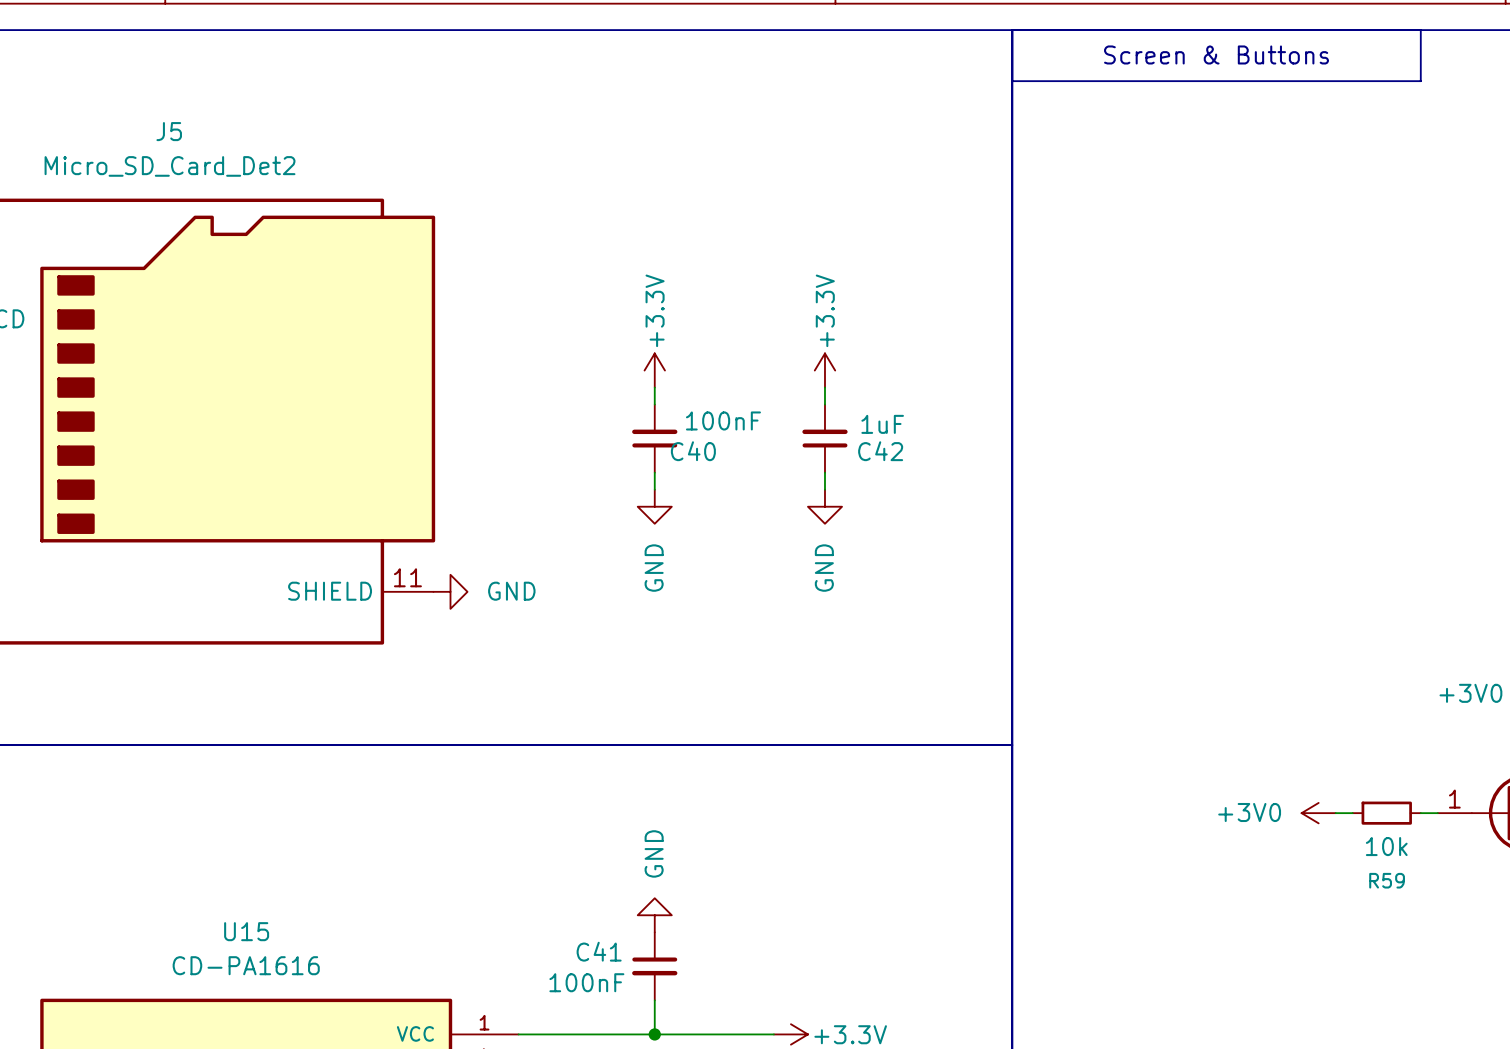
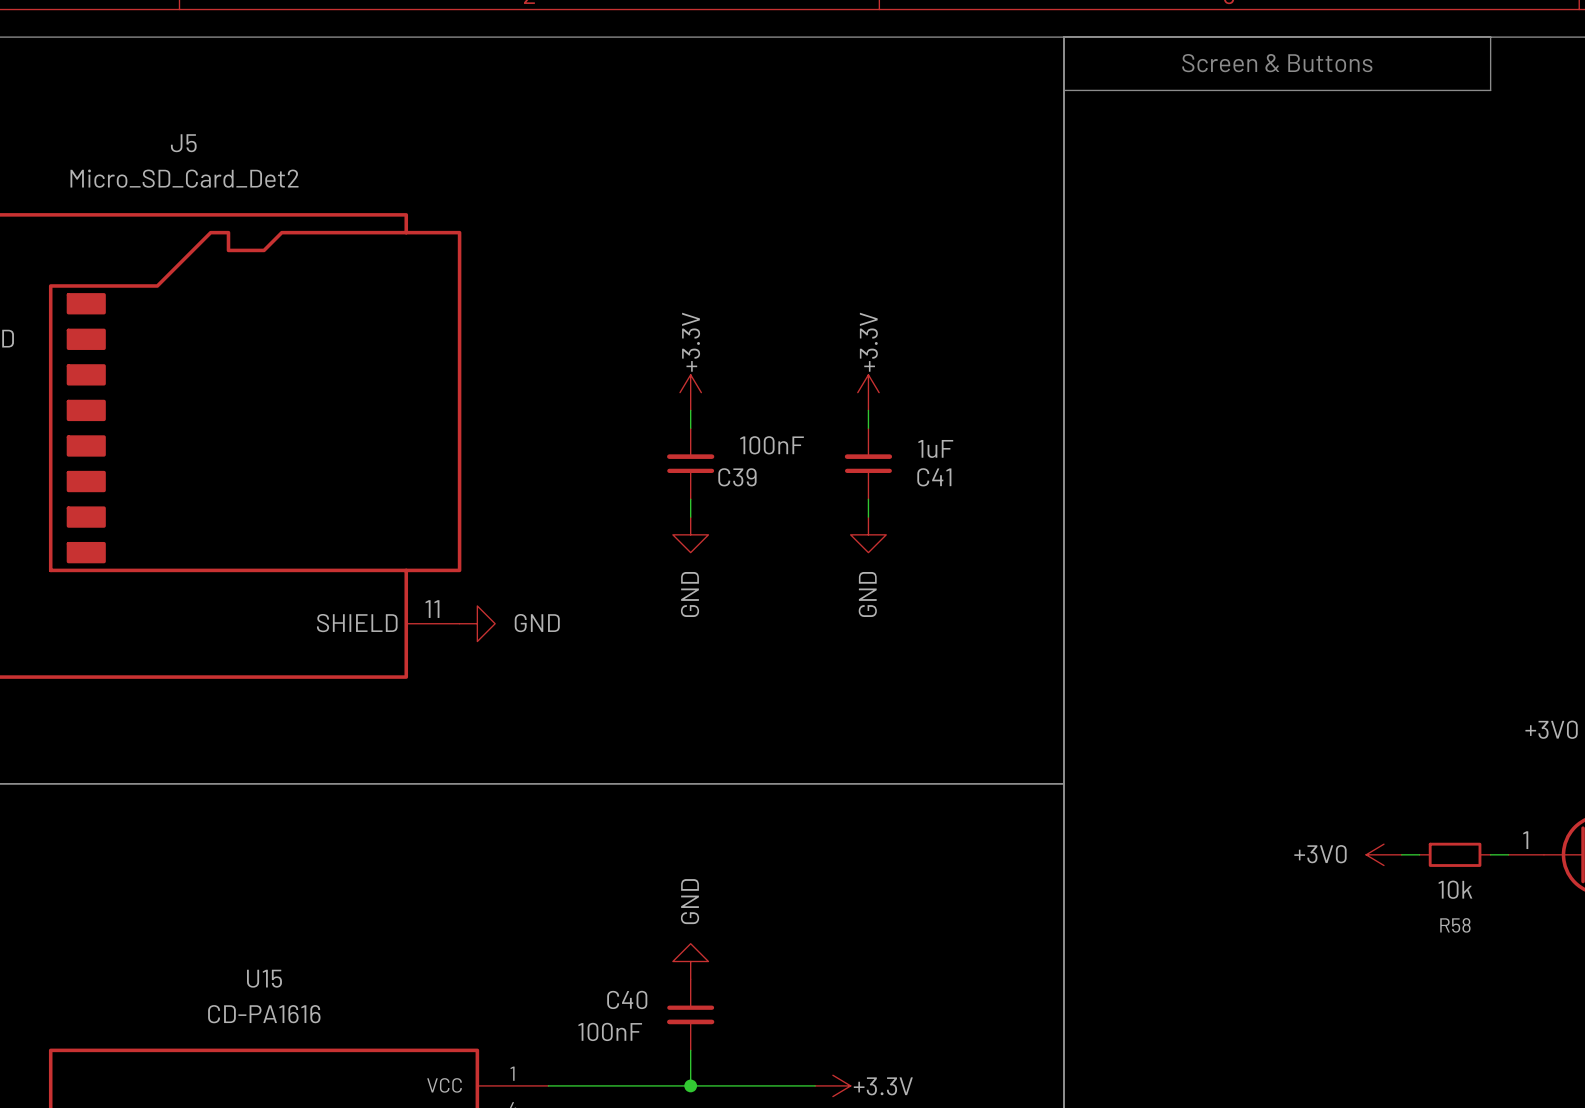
C40 name: C40 (693, 451) -> C39 (737, 477)
C42 name: C42 (880, 451) -> C41 (934, 477)
R59 name: R59 (1387, 880) -> R58 (1455, 925)
C41 name: C41 (599, 951) -> C40 (627, 999)

